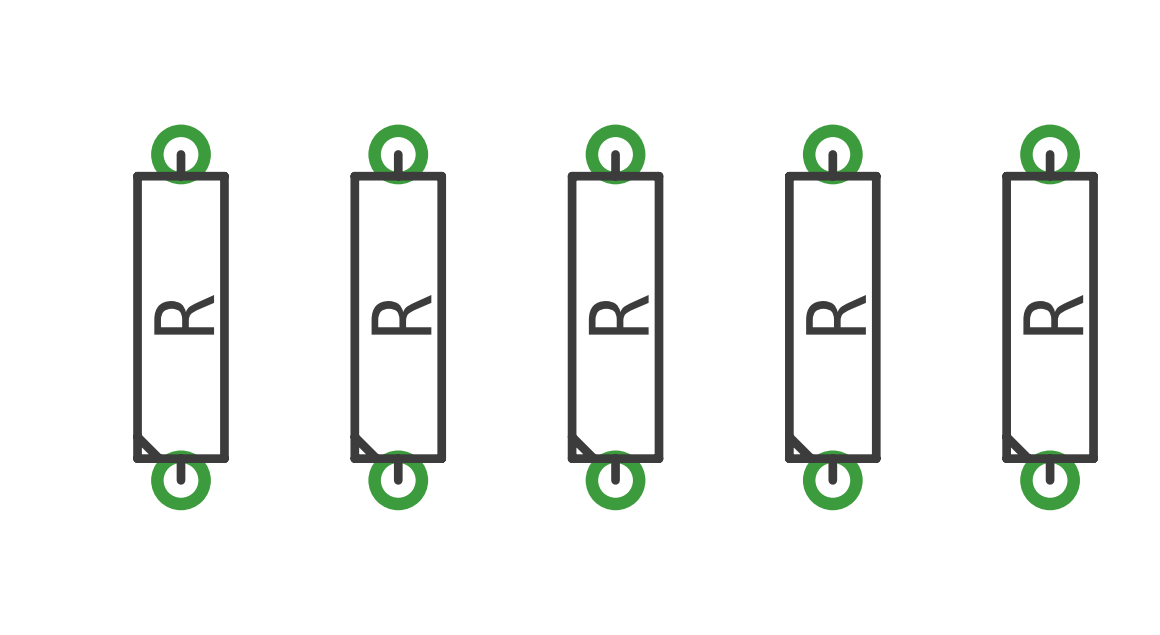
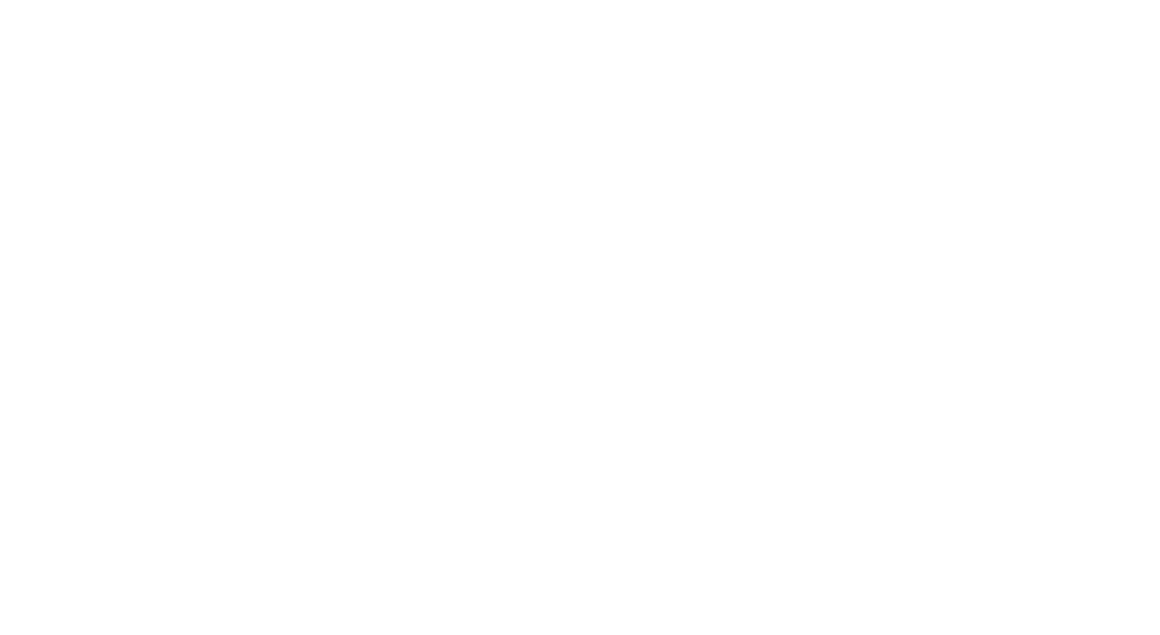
part: R (180, 317) -> none
part: R (398, 317) -> none
part: R (615, 317) -> none
part: R (832, 317) -> none
part: R (1050, 317) -> none

